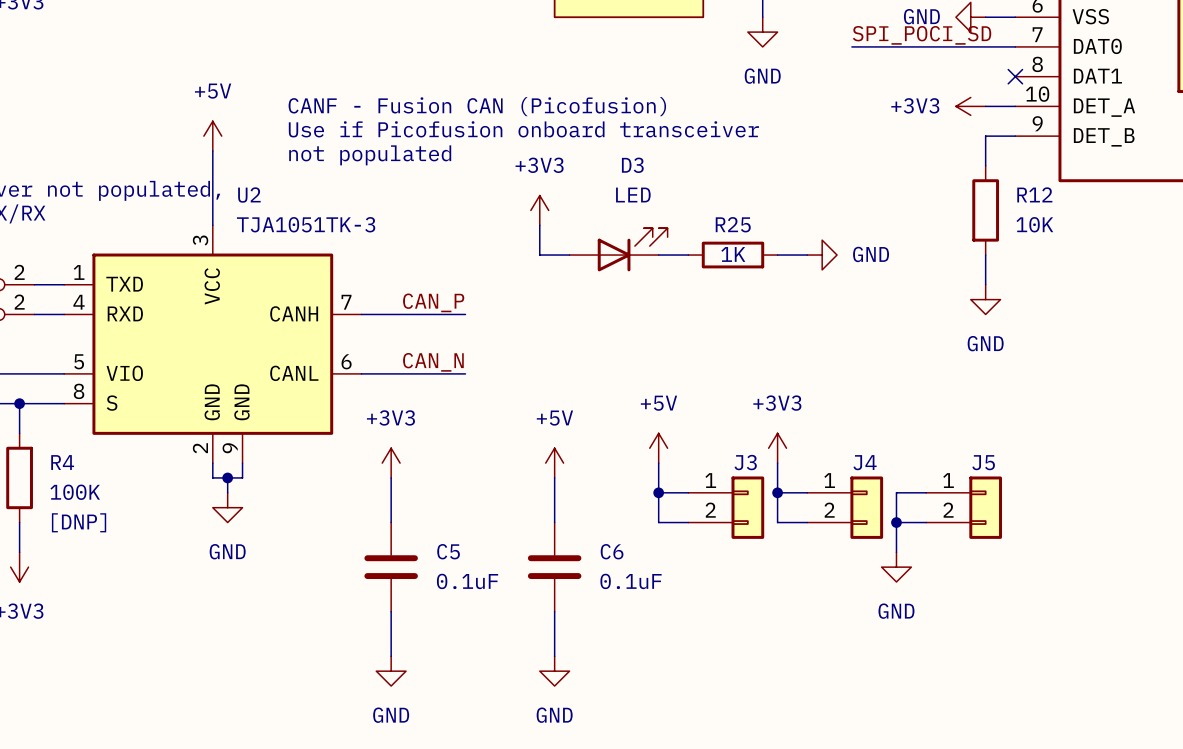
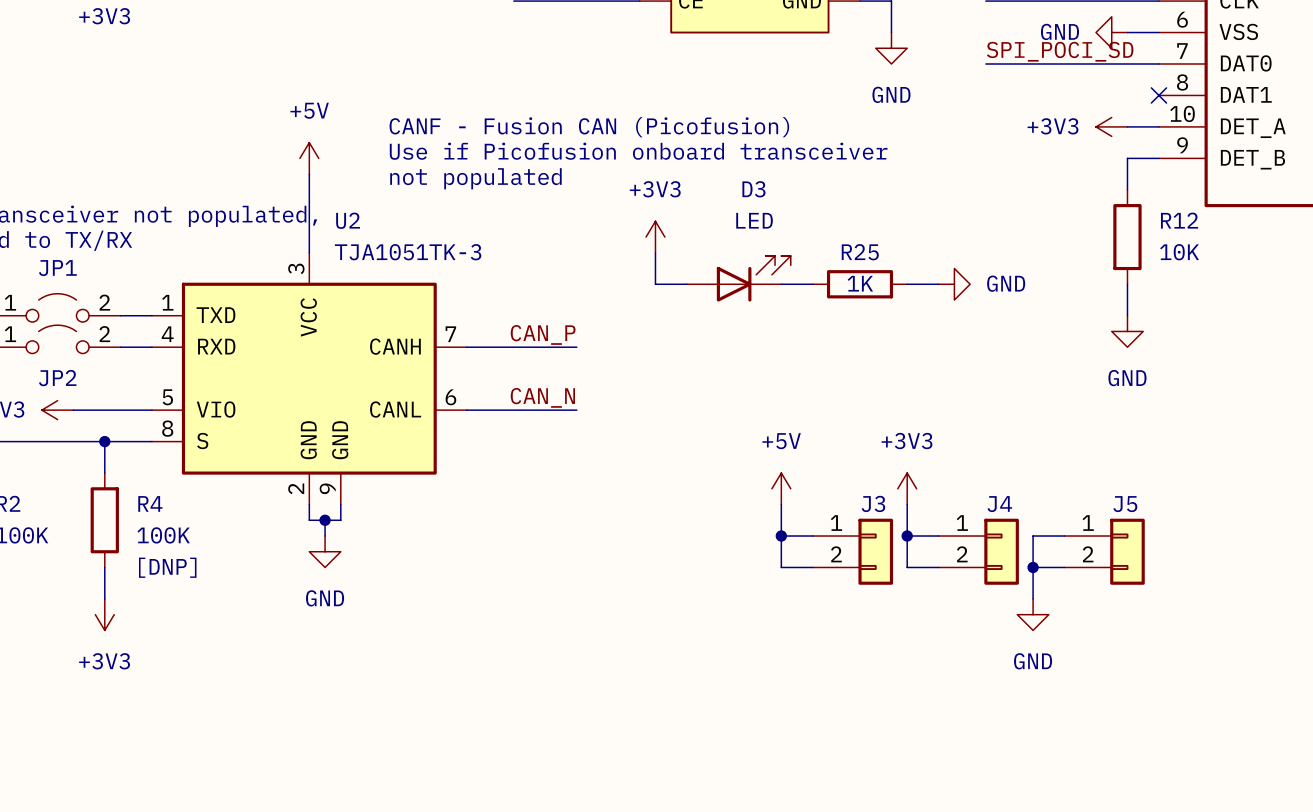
power symbol: +3V3 (391, 463) -> none
power symbol: +5V (554, 463) -> none
wire: (391, 477) (391, 522) -> none
wire: (554, 477) (554, 522) -> none
C5: 0.1uF (391, 567) -> none
C6: 0.1uF (554, 567) -> none
wire: (391, 611) (391, 656) -> none
wire: (554, 611) (554, 656) -> none
power symbol: GND (391, 671) -> none
power symbol: GND (554, 671) -> none

